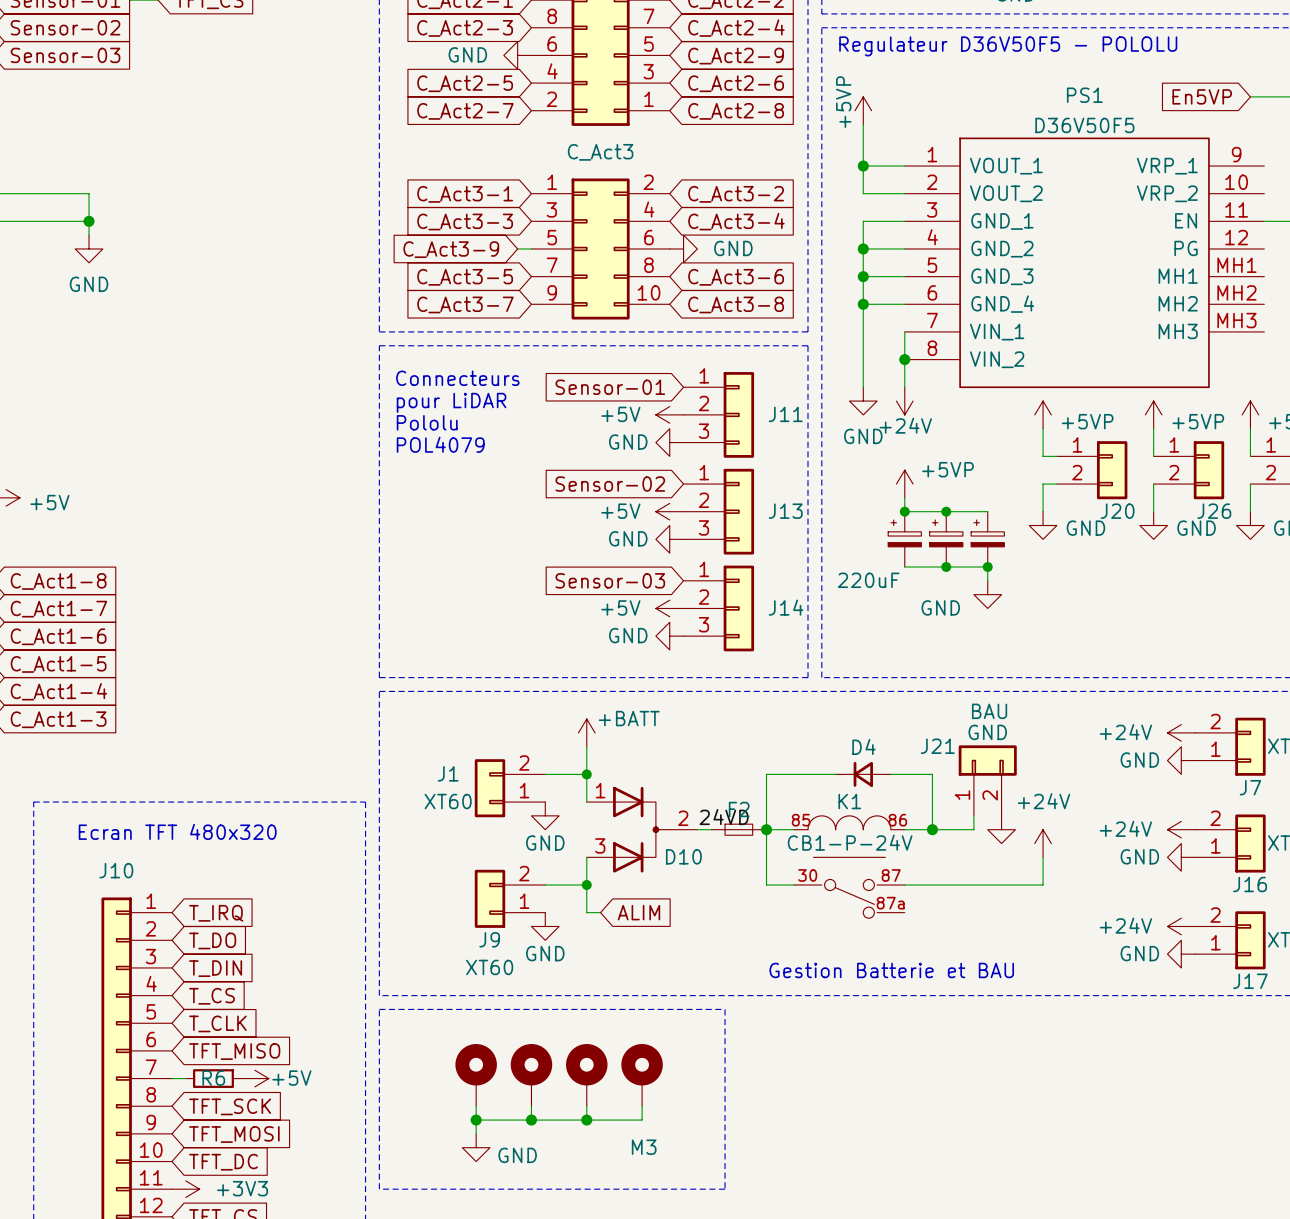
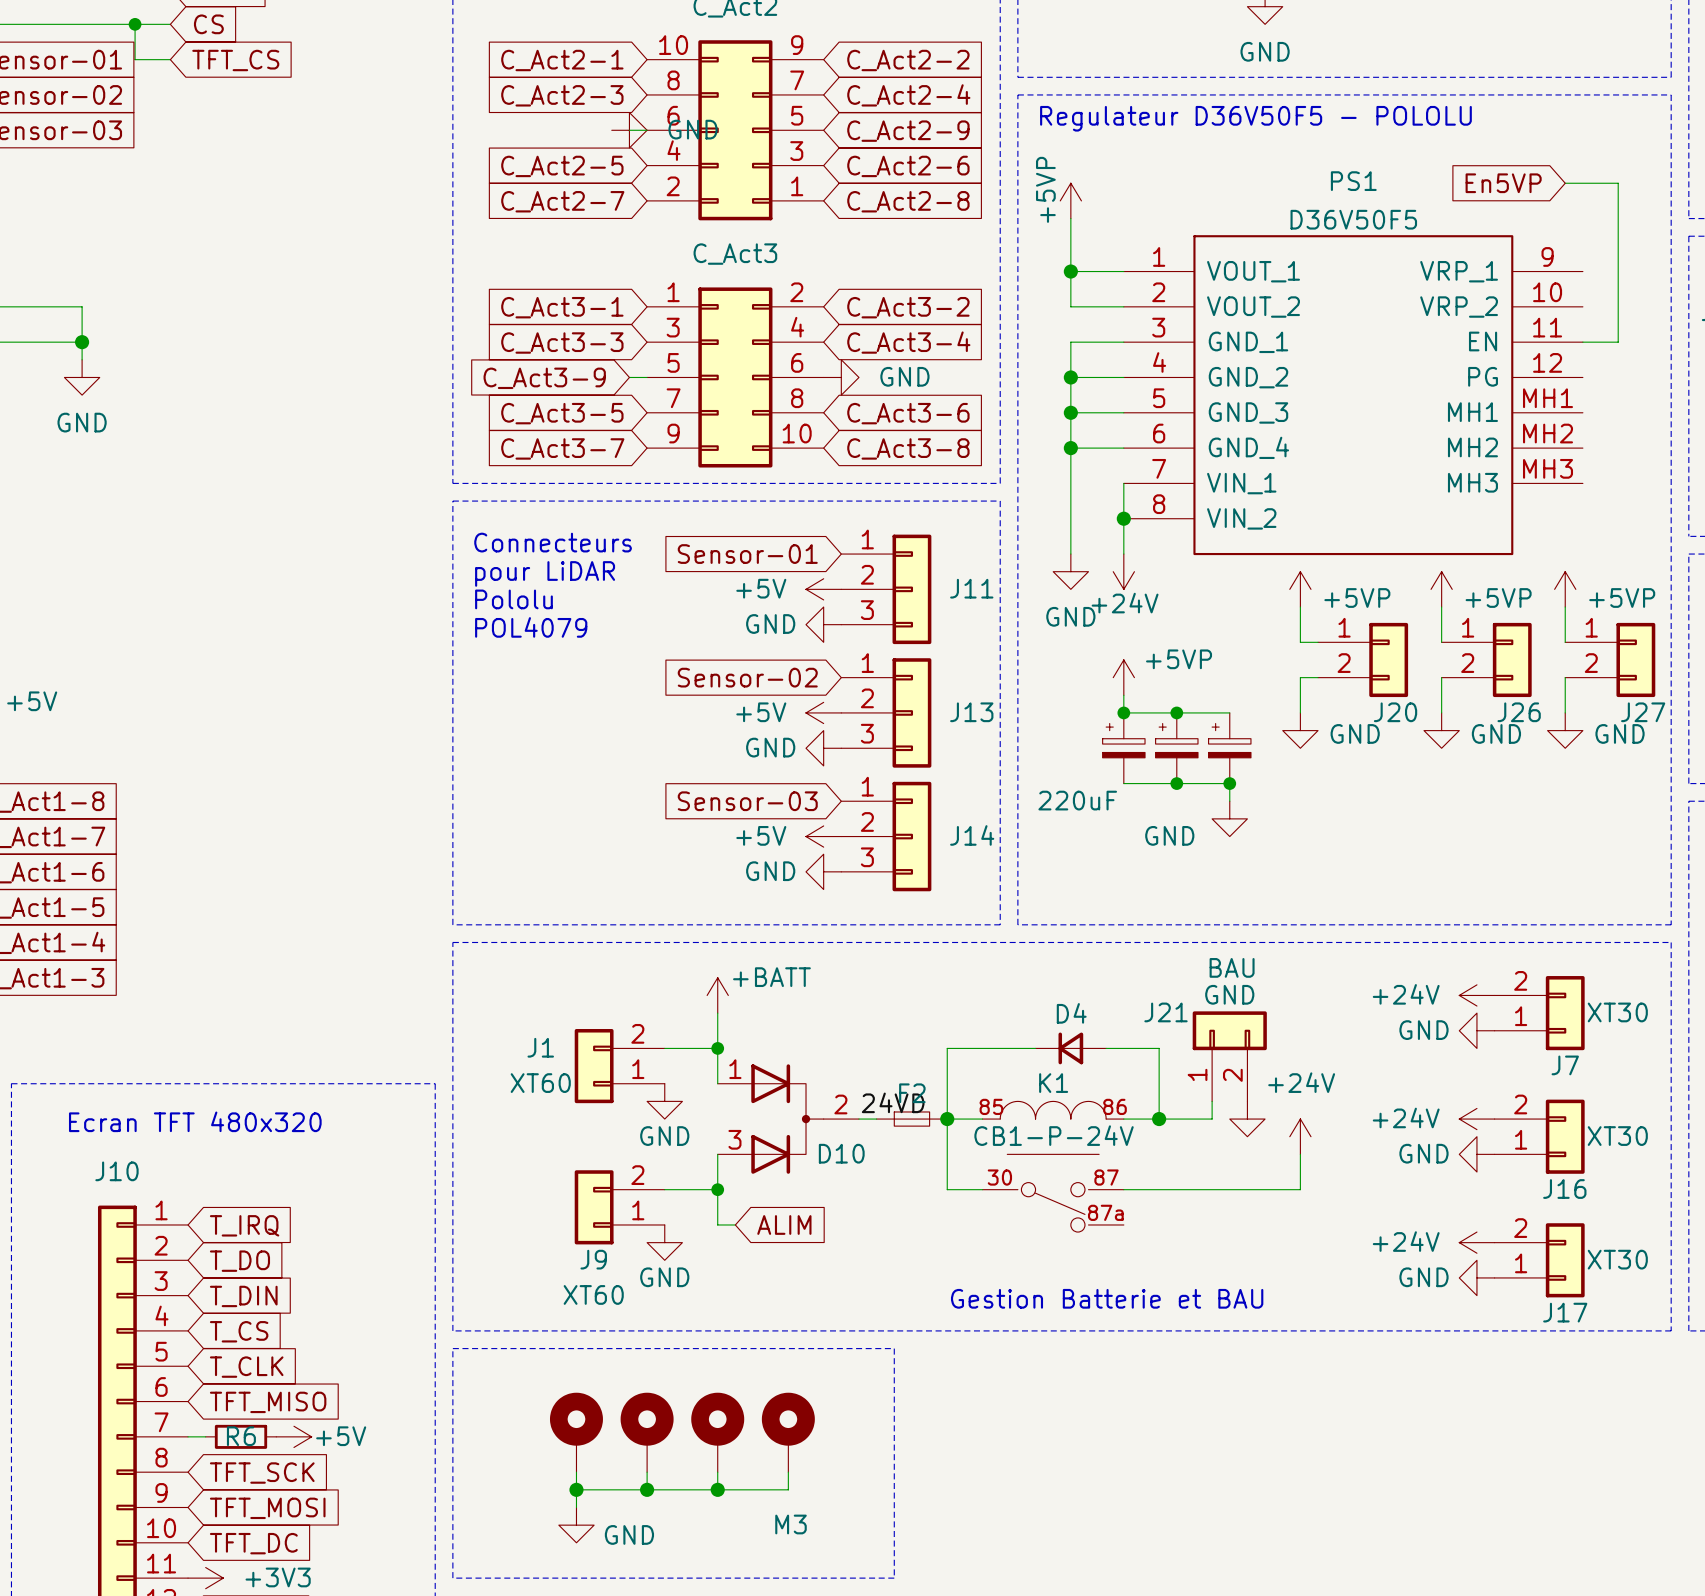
power symbol rotation: 0° (517, 55) -> 180° (629, 130)

